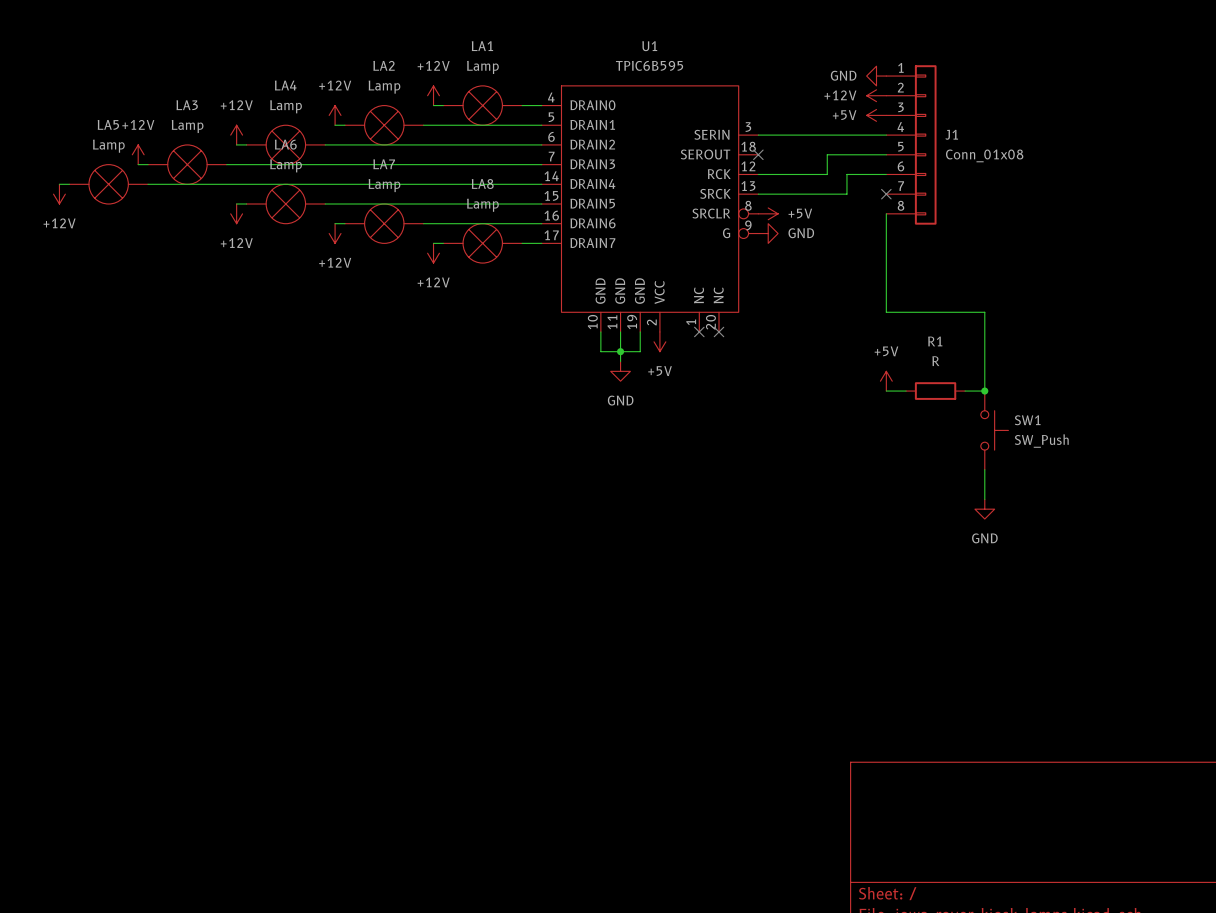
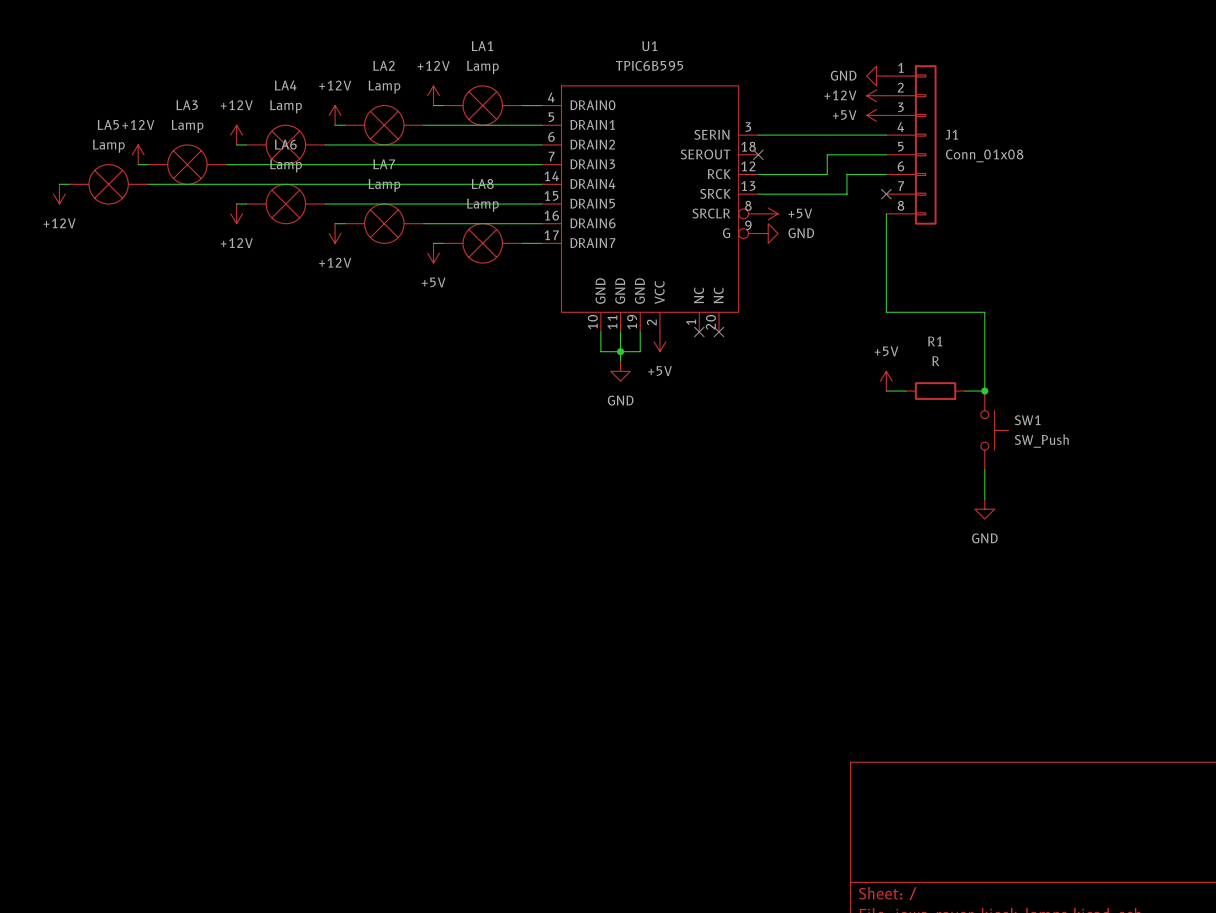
power symbol: +12V (433, 253) -> +5V (433, 253)

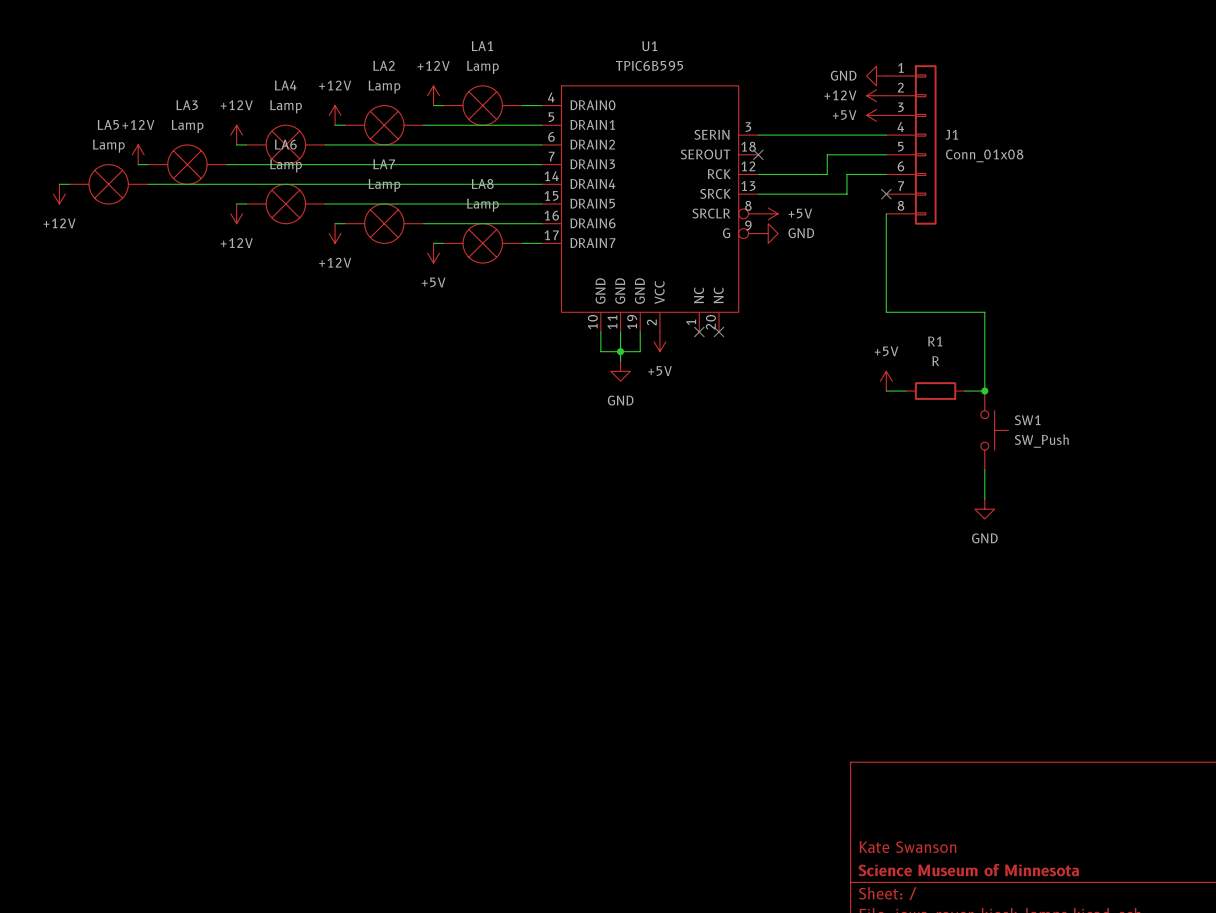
title block: none -> Kate Swanson (907, 847)
title block: none -> Science Museum of Minnesota (968, 870)

